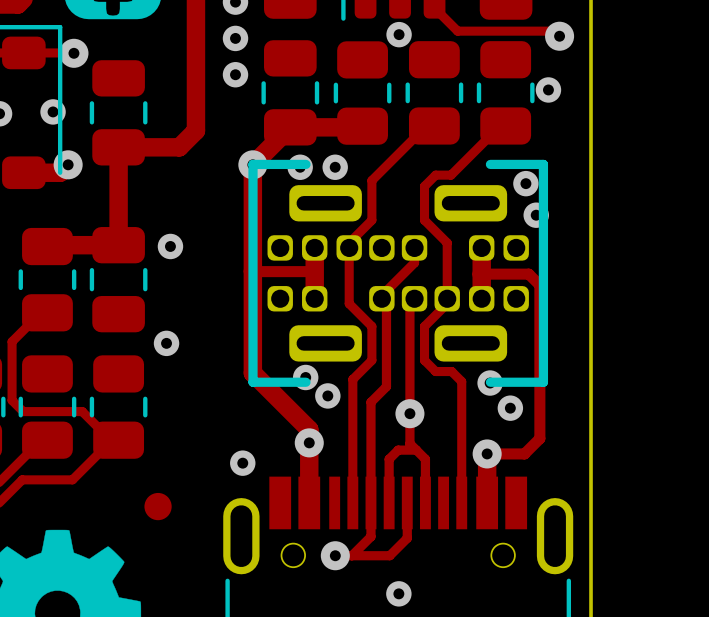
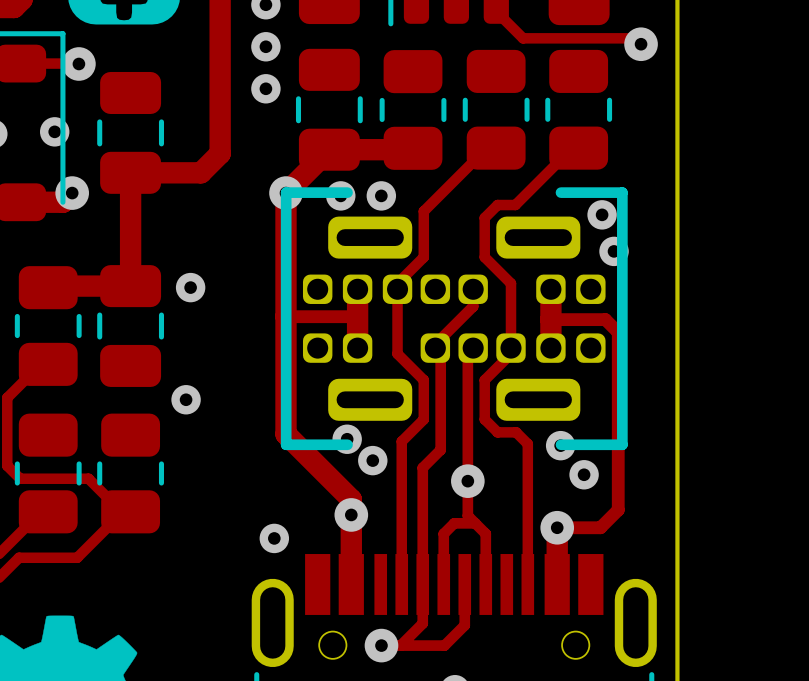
via: (399, 34) -> none
via: (548, 89) -> none
part: (158, 506) -> none

